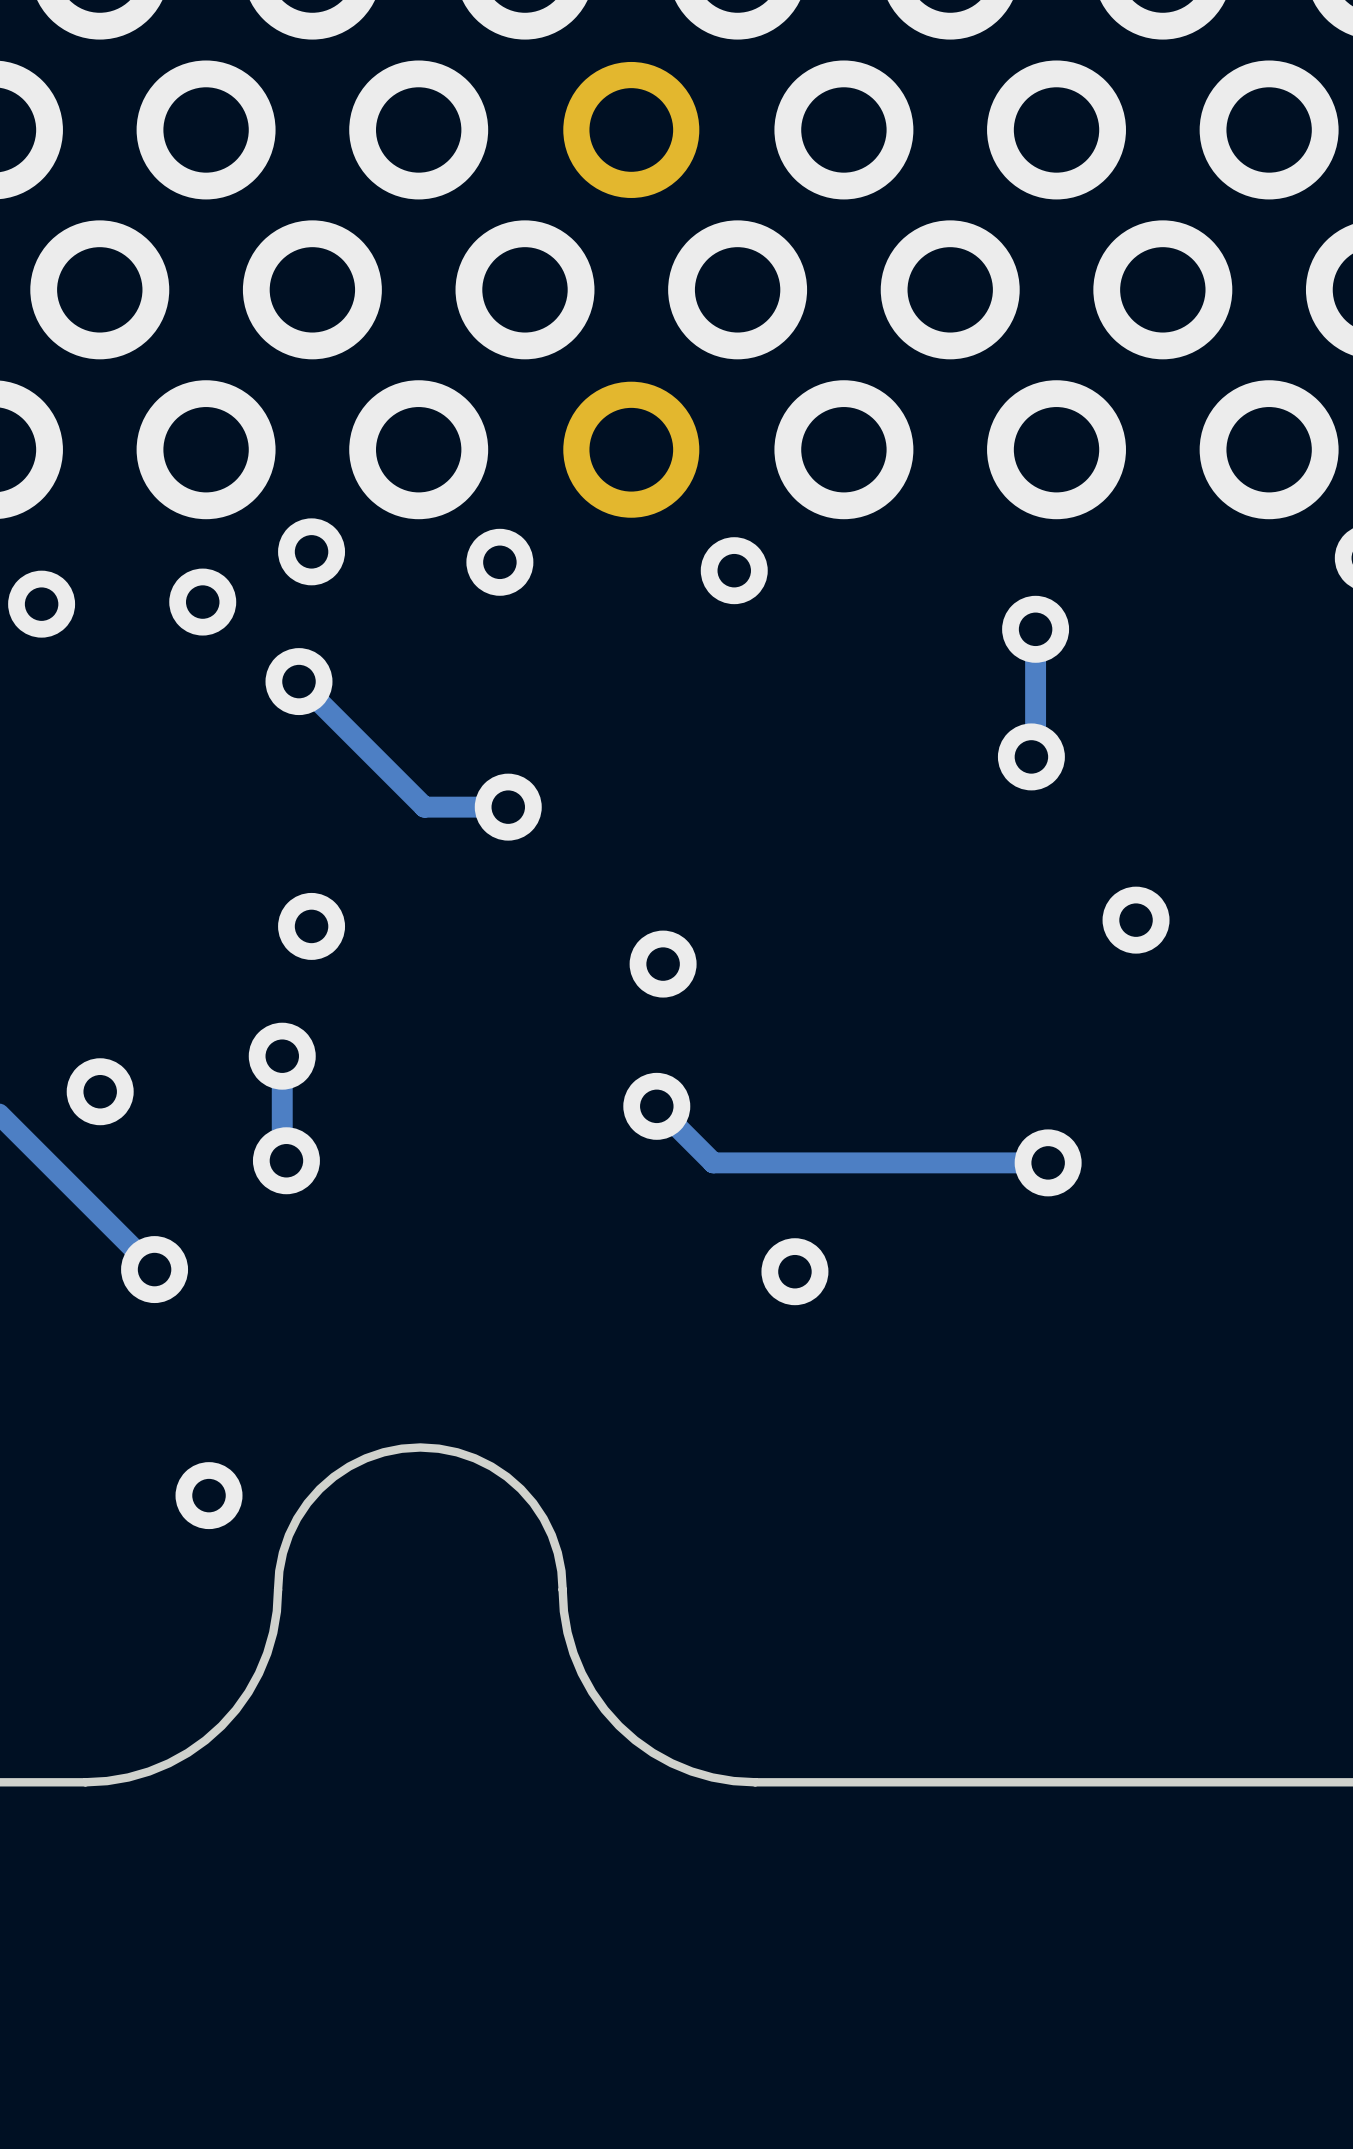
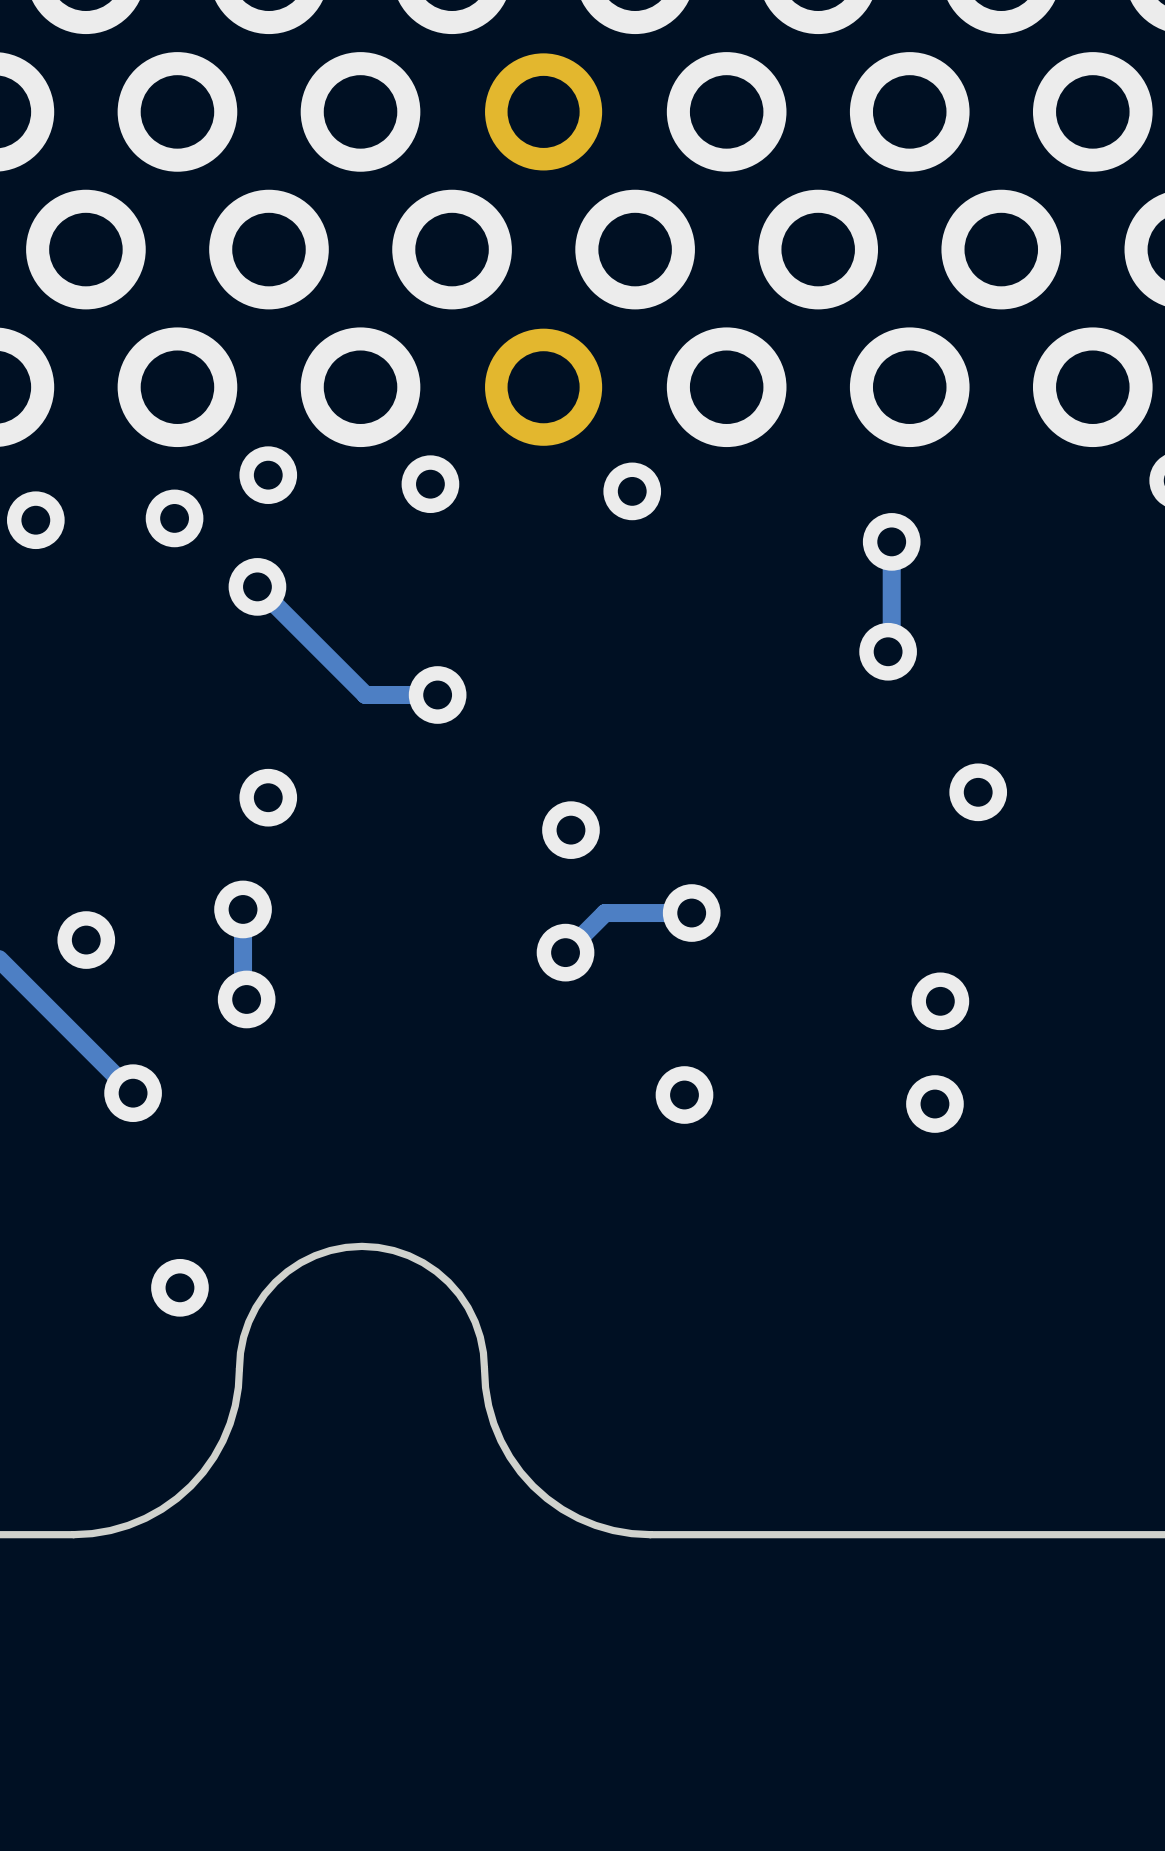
via: none -> (691, 913)
track: (656, 1106) (713, 1162) (1048, 1162) -> (565, 952) (605, 913) (691, 913)
via position: (1048, 1162) -> (940, 1001)
via: none -> (934, 1104)

